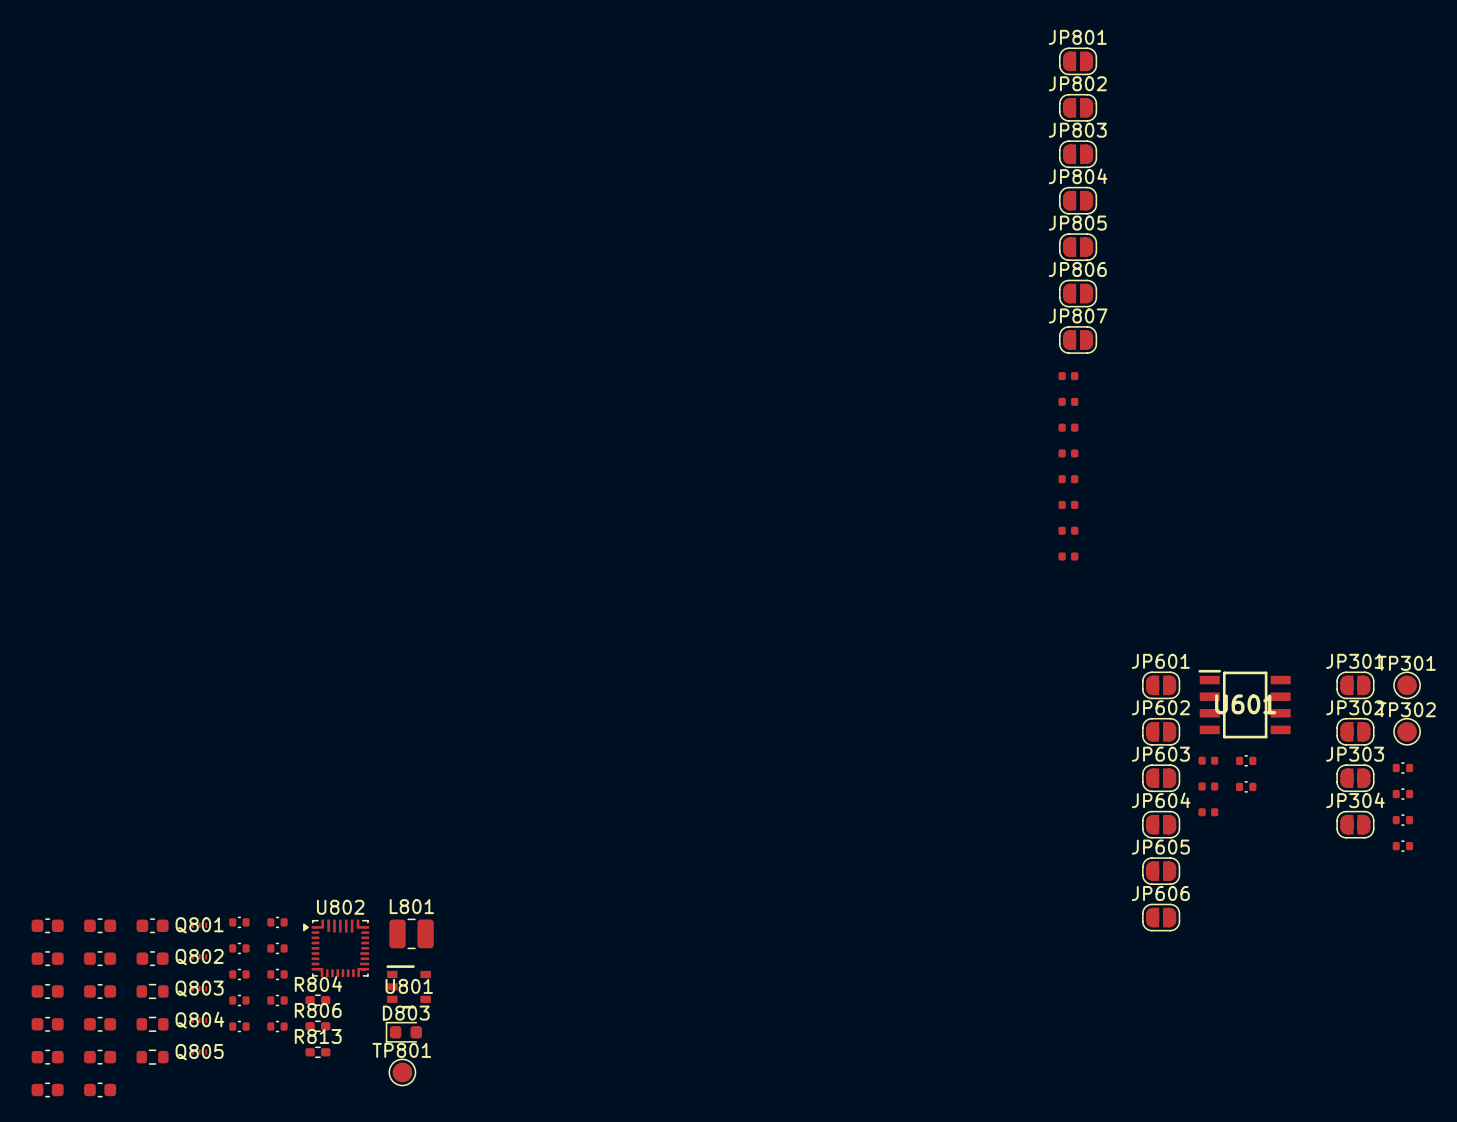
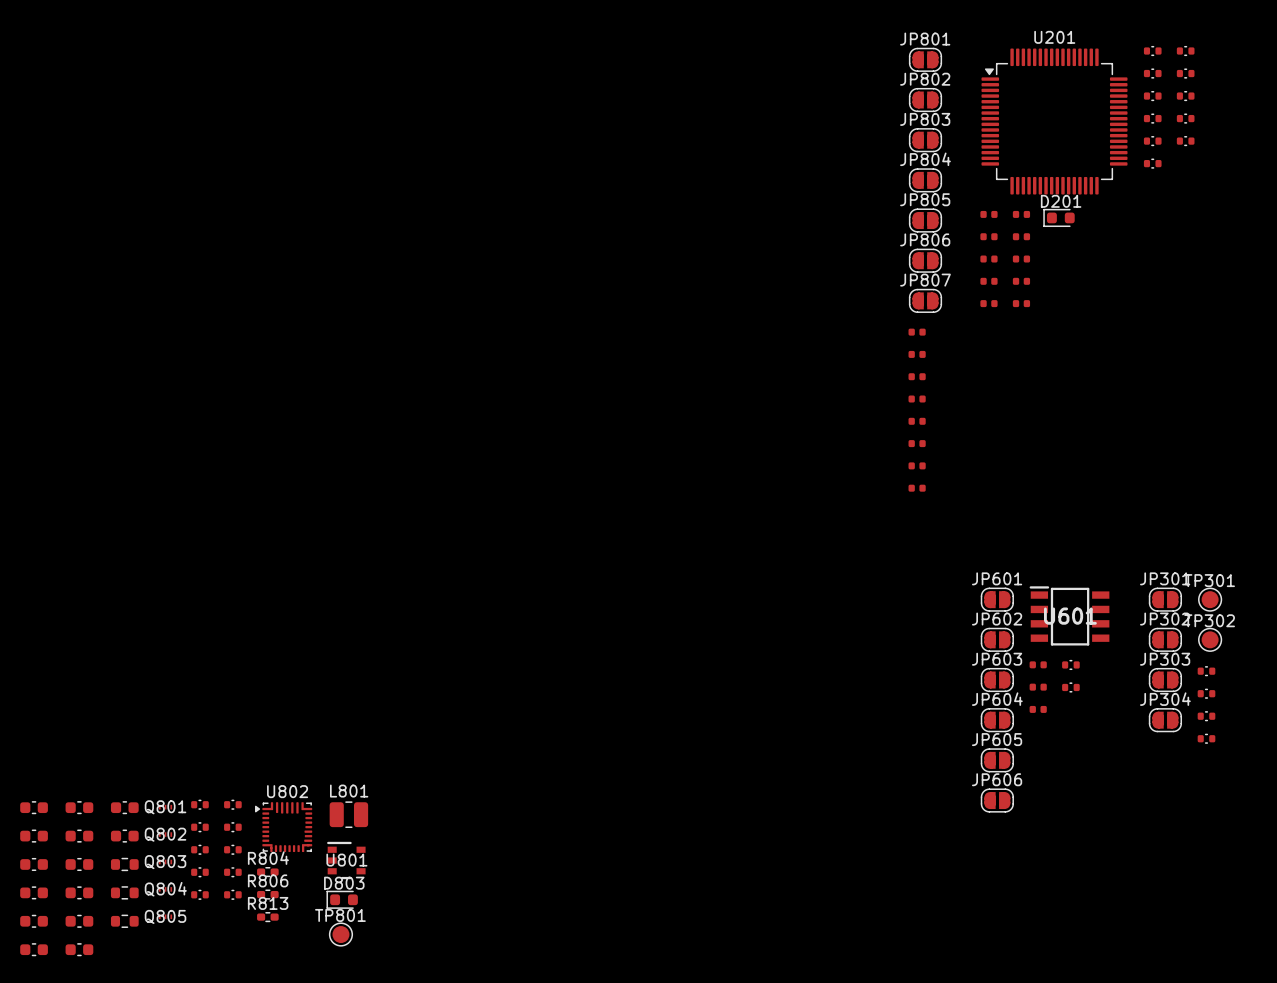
part: none -> (1152, 51)
part: none -> (1185, 51)
part: none -> (1152, 73)
part: none -> (1185, 73)
part: none -> (1152, 96)
part: none -> (1185, 96)
part: none -> (1152, 118)
part: none -> (1185, 118)
U201: none -> (1054, 121)
part: none -> (1152, 141)
part: none -> (1185, 141)
part: none -> (1152, 163)
part: none -> (988, 214)
part: none -> (1021, 214)
D201: none -> (1059, 217)
part: none -> (988, 236)
part: none -> (1021, 236)
part: none -> (988, 259)
part: none -> (1021, 259)
part: none -> (988, 281)
part: none -> (1021, 281)
part: none -> (988, 303)
part: none -> (1021, 303)

